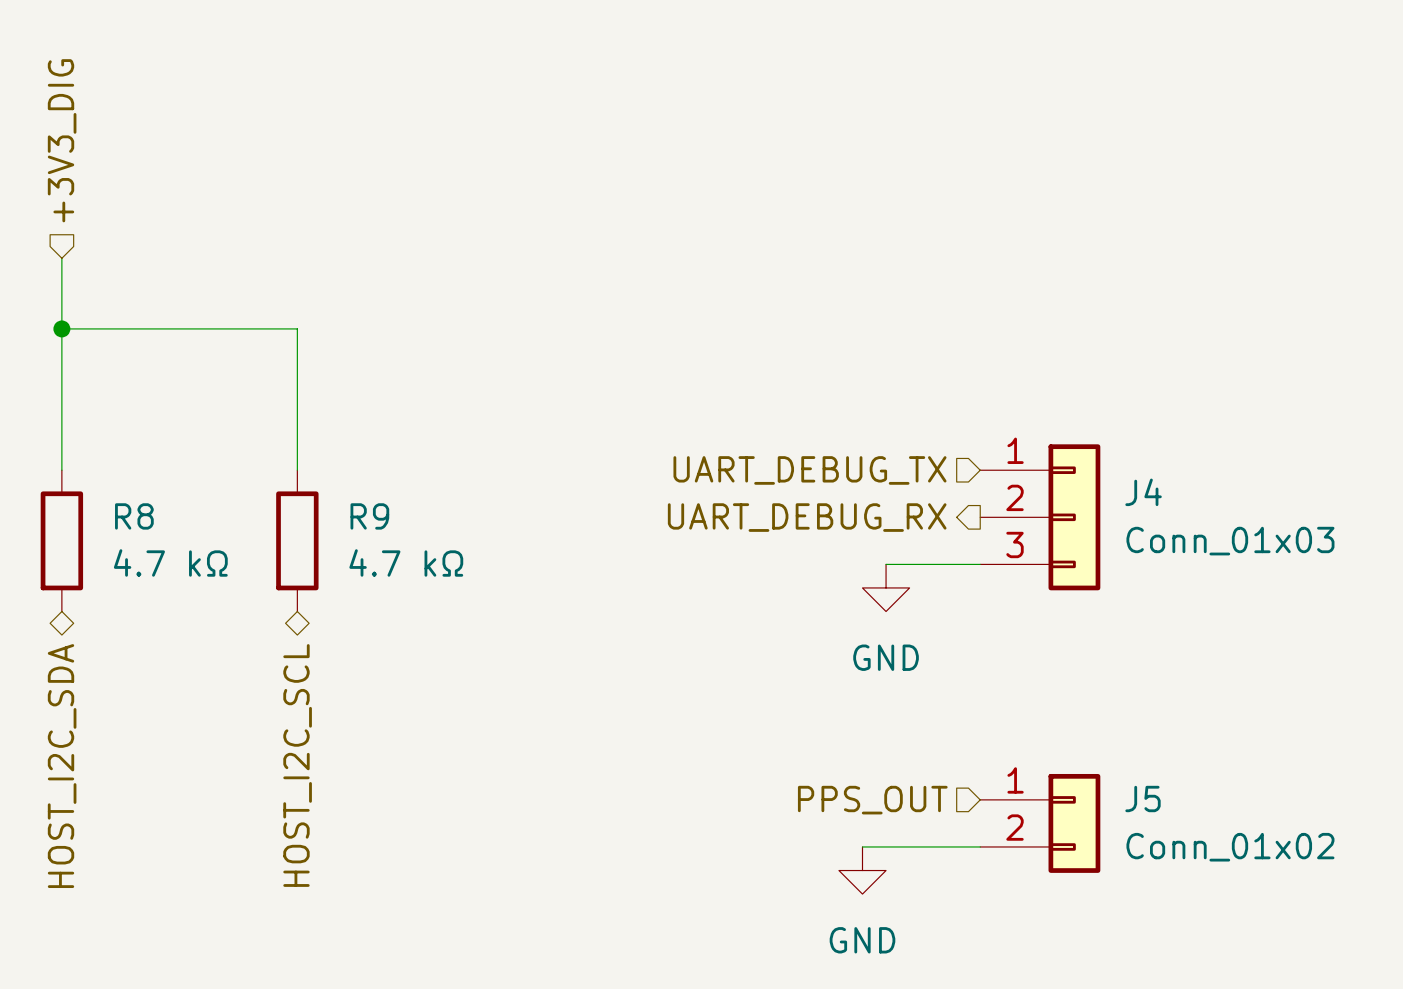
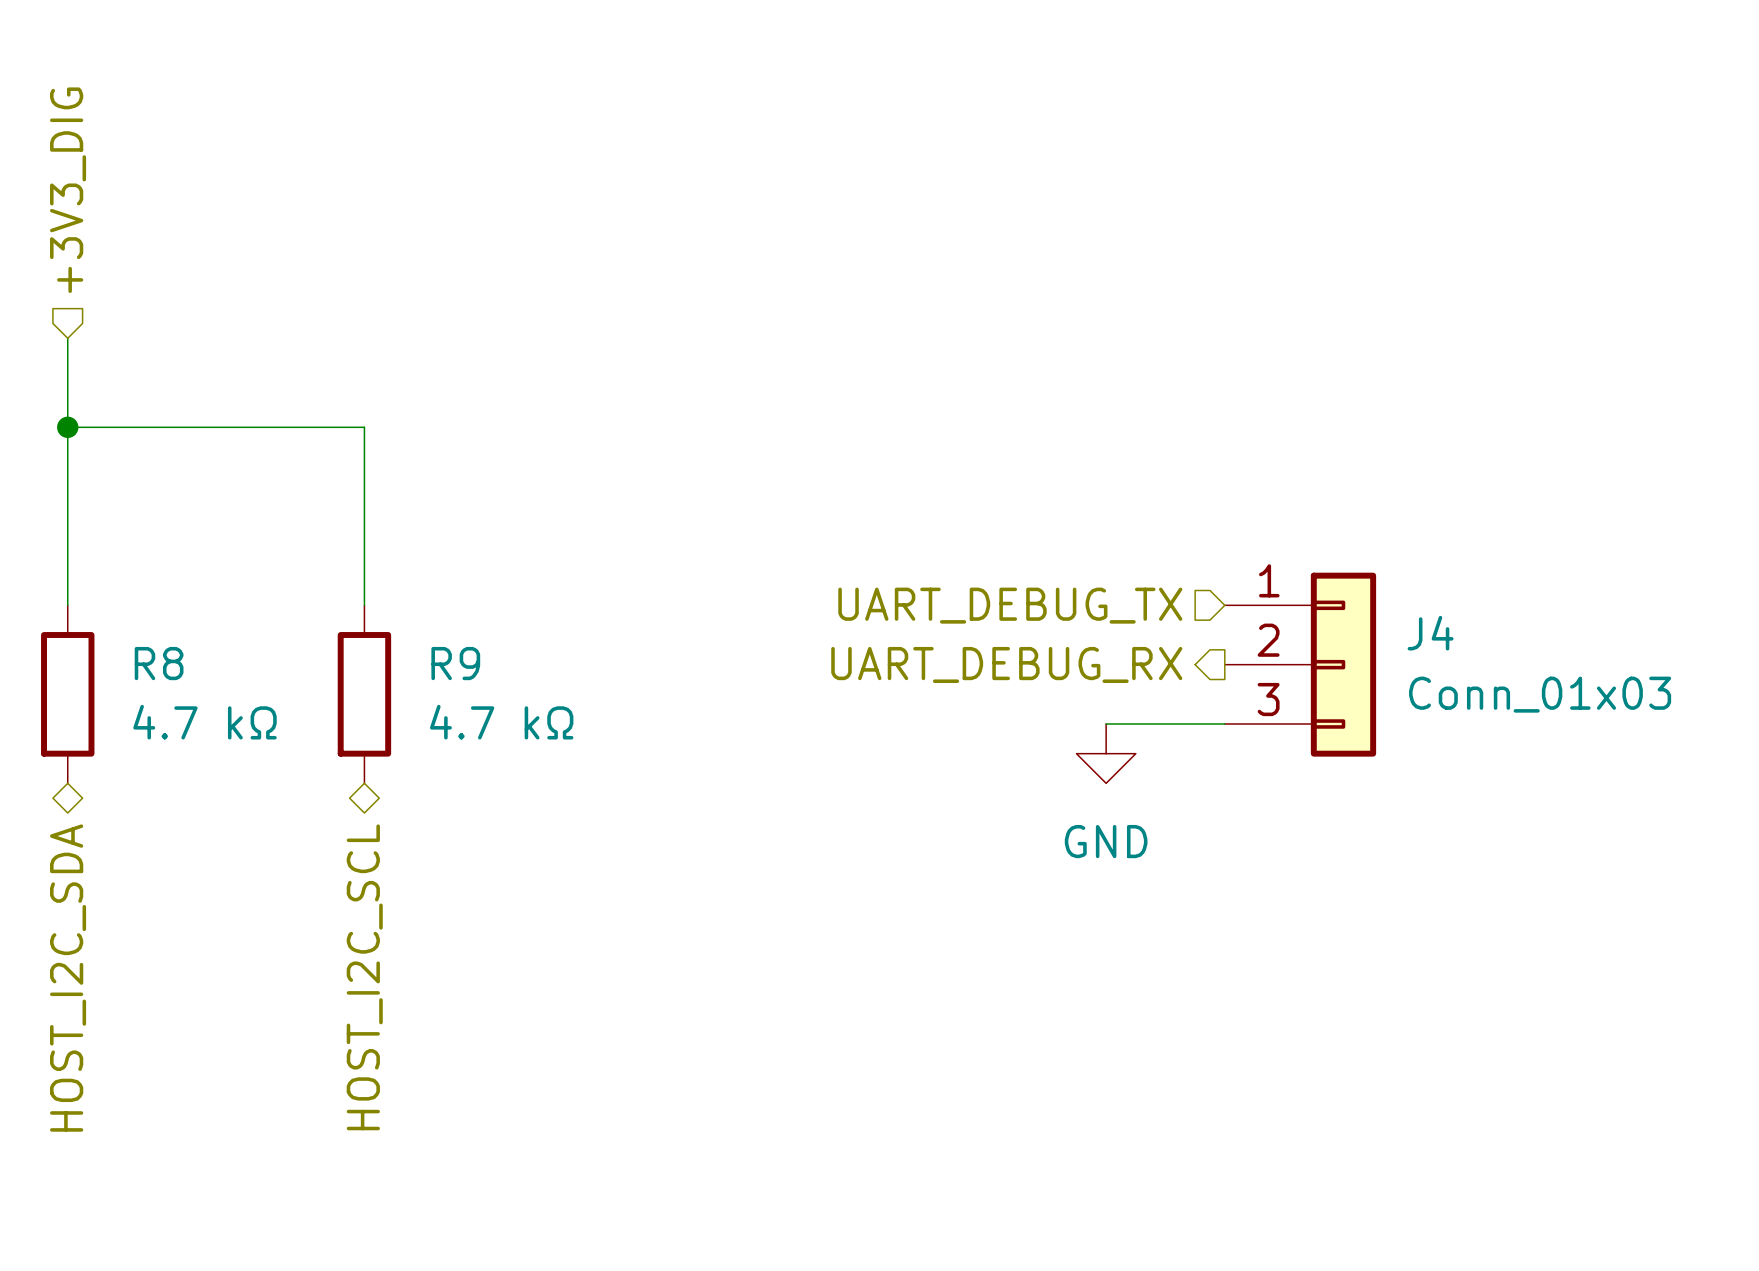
hierarchical label: PPS_OUT (872, 800) -> none
J5: Conn_01x02 (1040, 823) -> none
wire: (862, 846) (980, 846) -> none
power symbol: GND (862, 870) -> none

